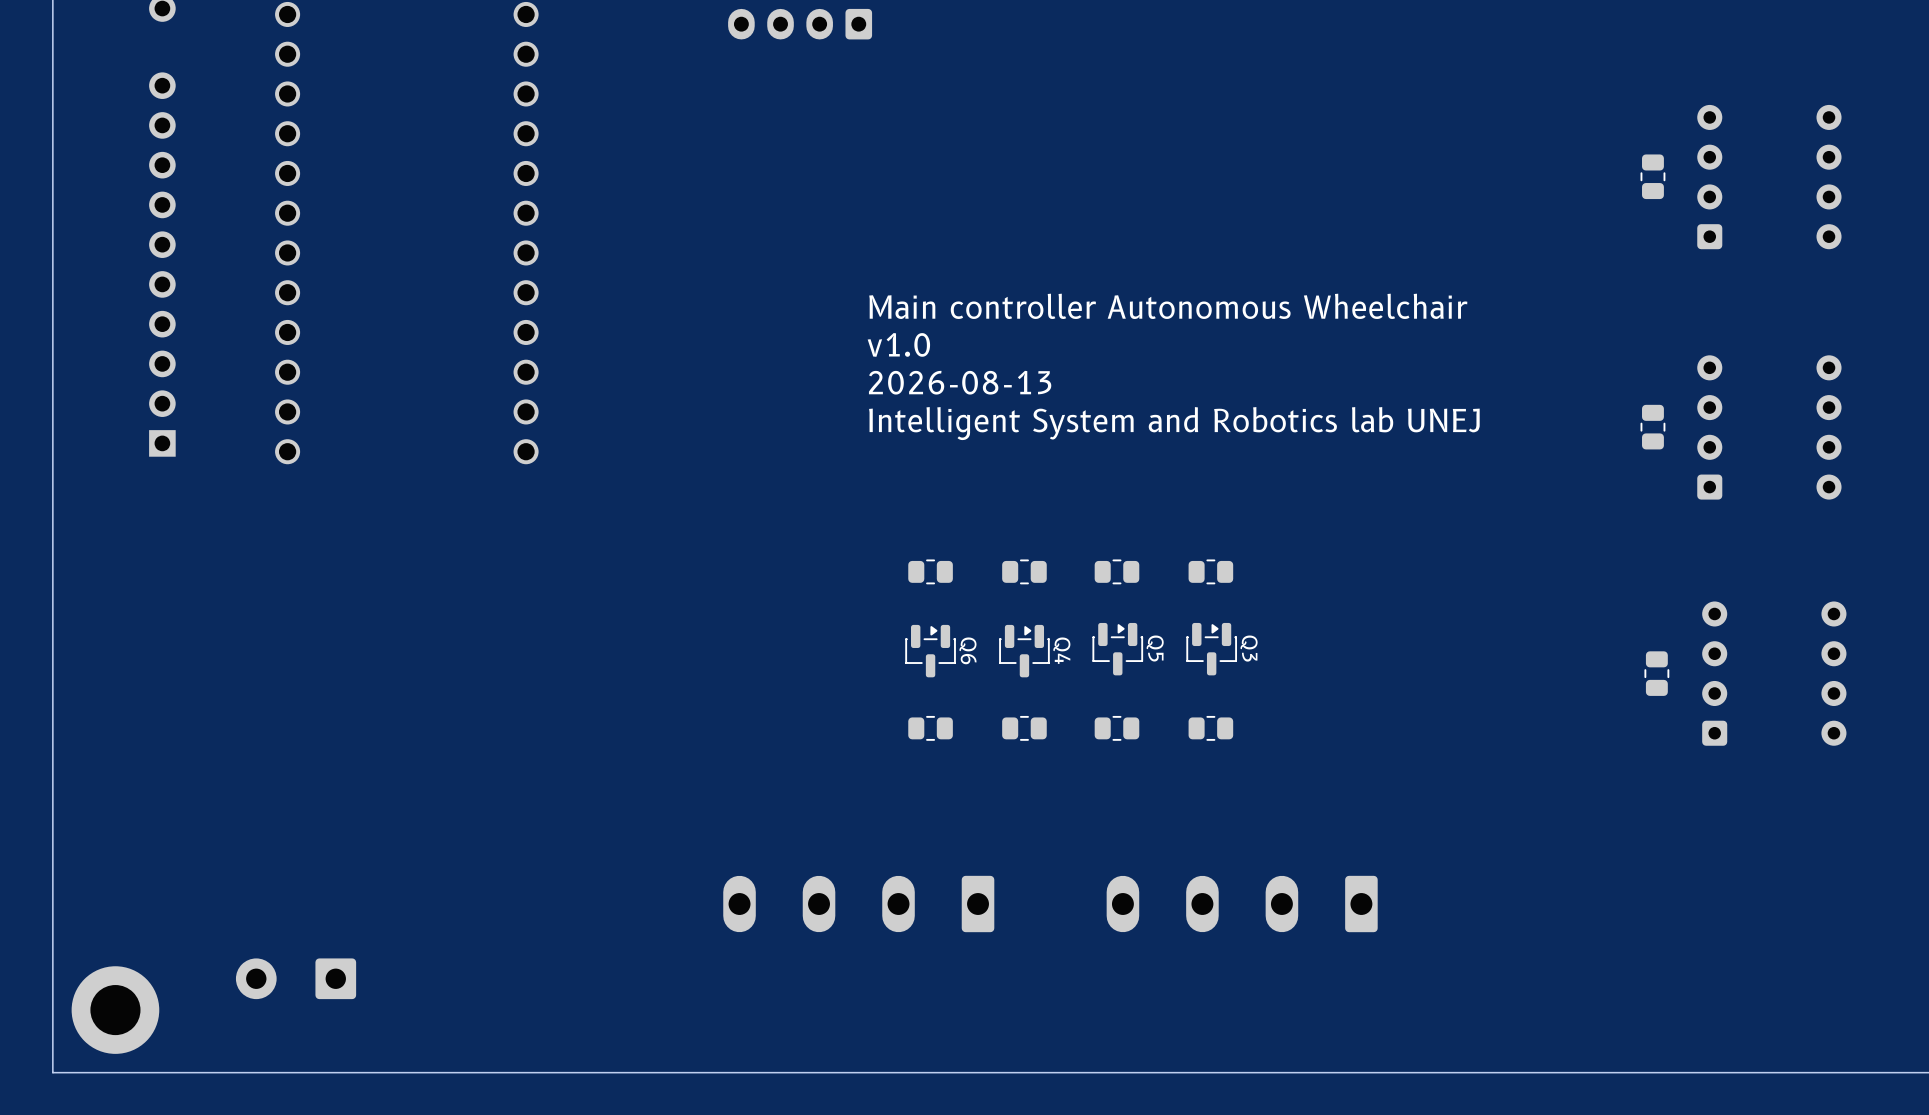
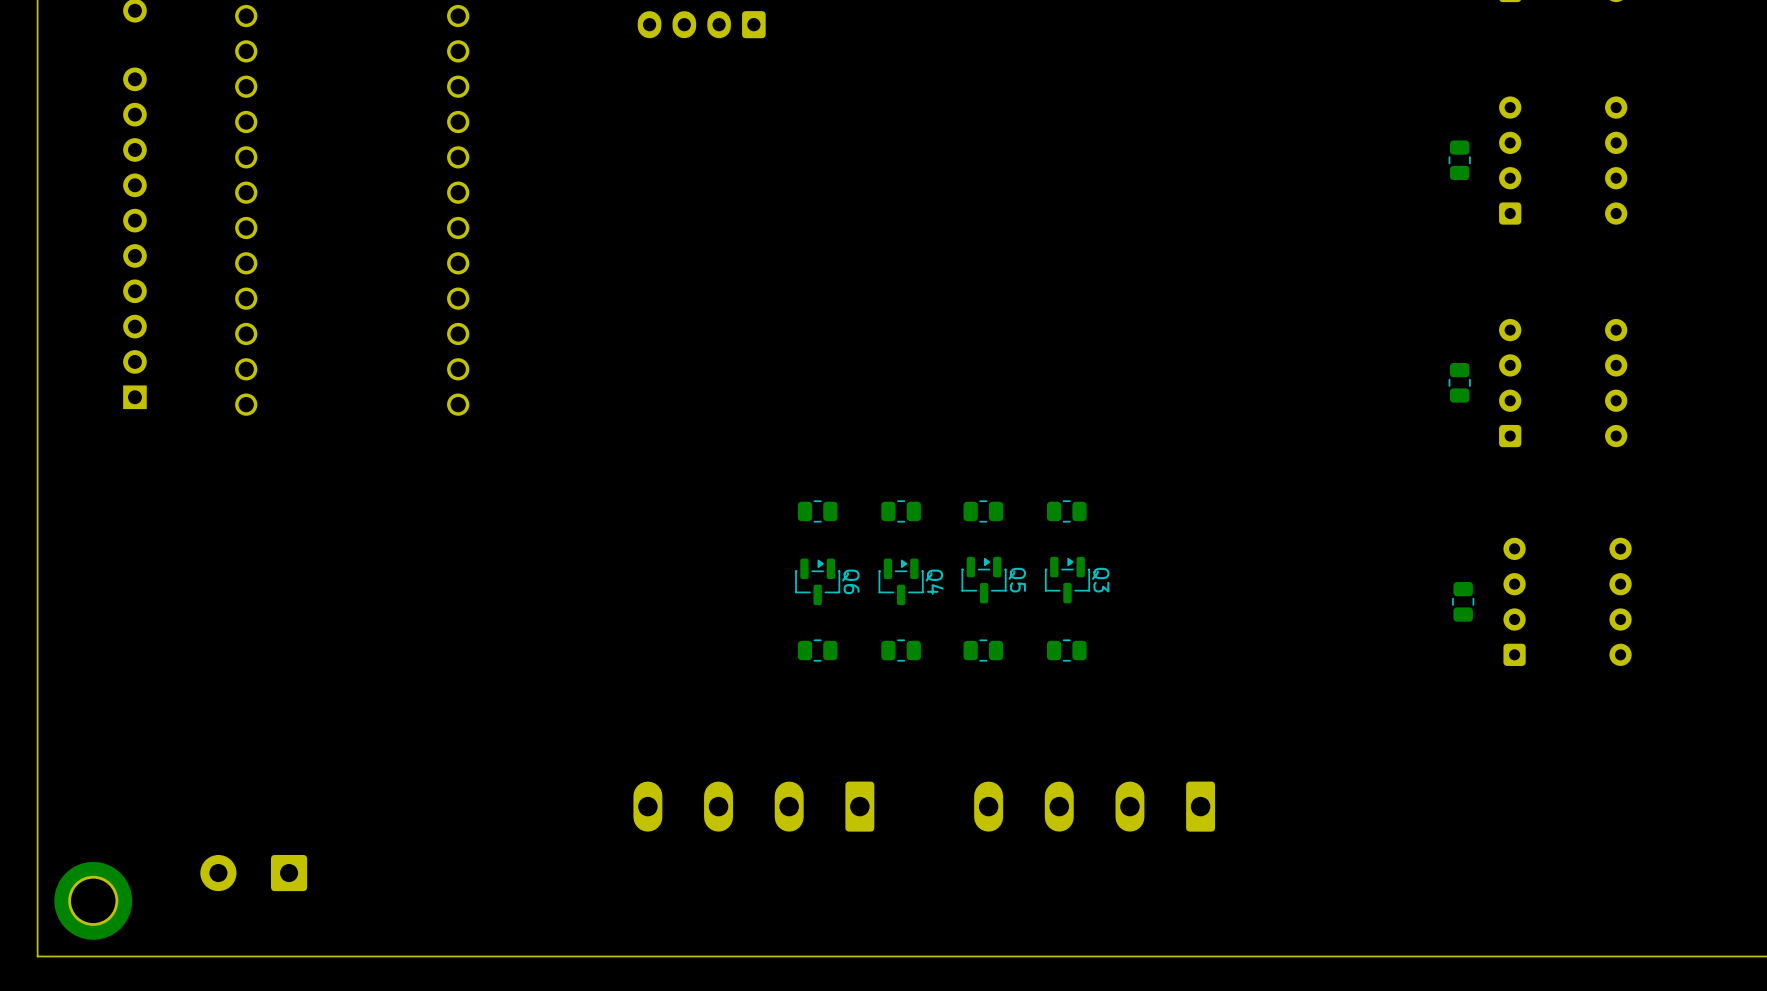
text: Main controller Autonomous Wheelchair (1168, 306) -> none
text: v1.0 (898, 344) -> none
text: 2026-08-13 (960, 382) -> none
text: Intelligent System and Robotics lab UNEJ (1174, 423) -> none

